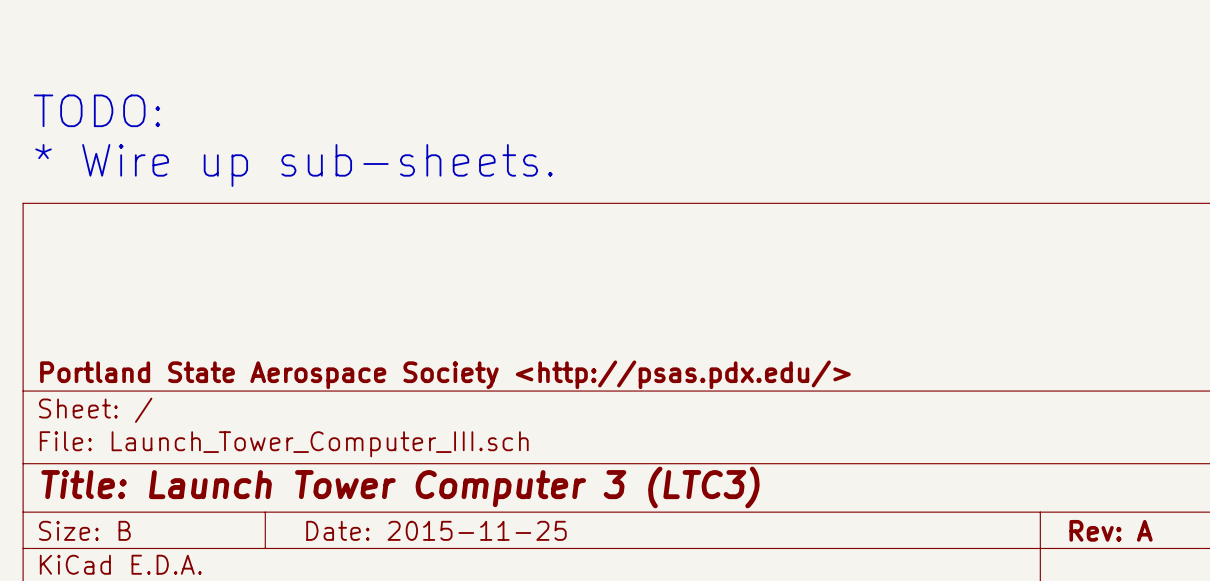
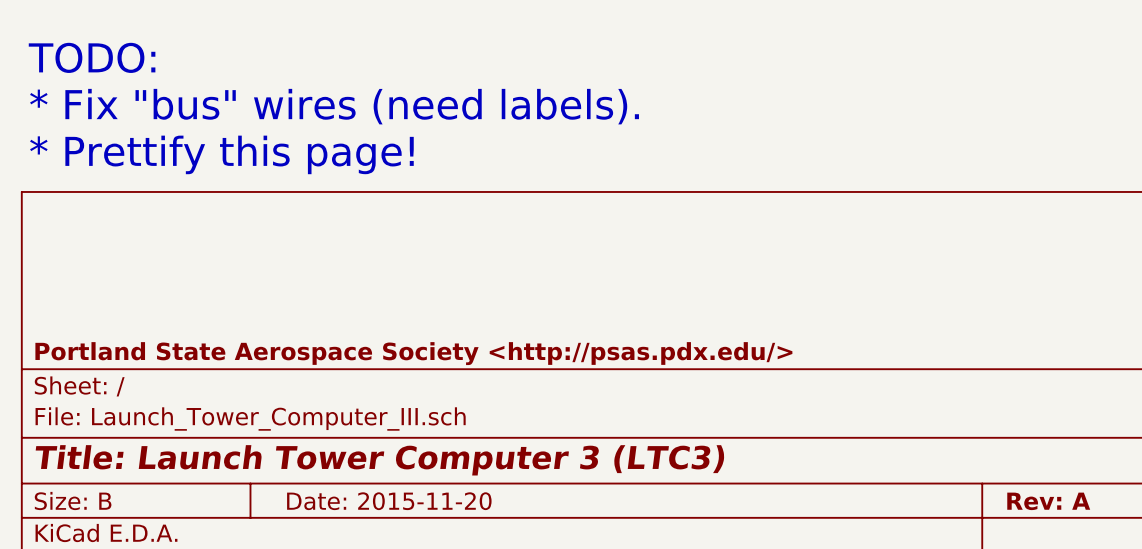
text: none -> TODO: (92, 57)
text: TODO: (97, 110) -> * Fix "bus" wires (need labels). (334, 106)
text: * Wire up sub-sheets. (294, 165) -> * Prettify this page! (221, 154)
title block: Date: 2015-11-25 (436, 530) -> Date: 2015-11-20 (389, 501)

